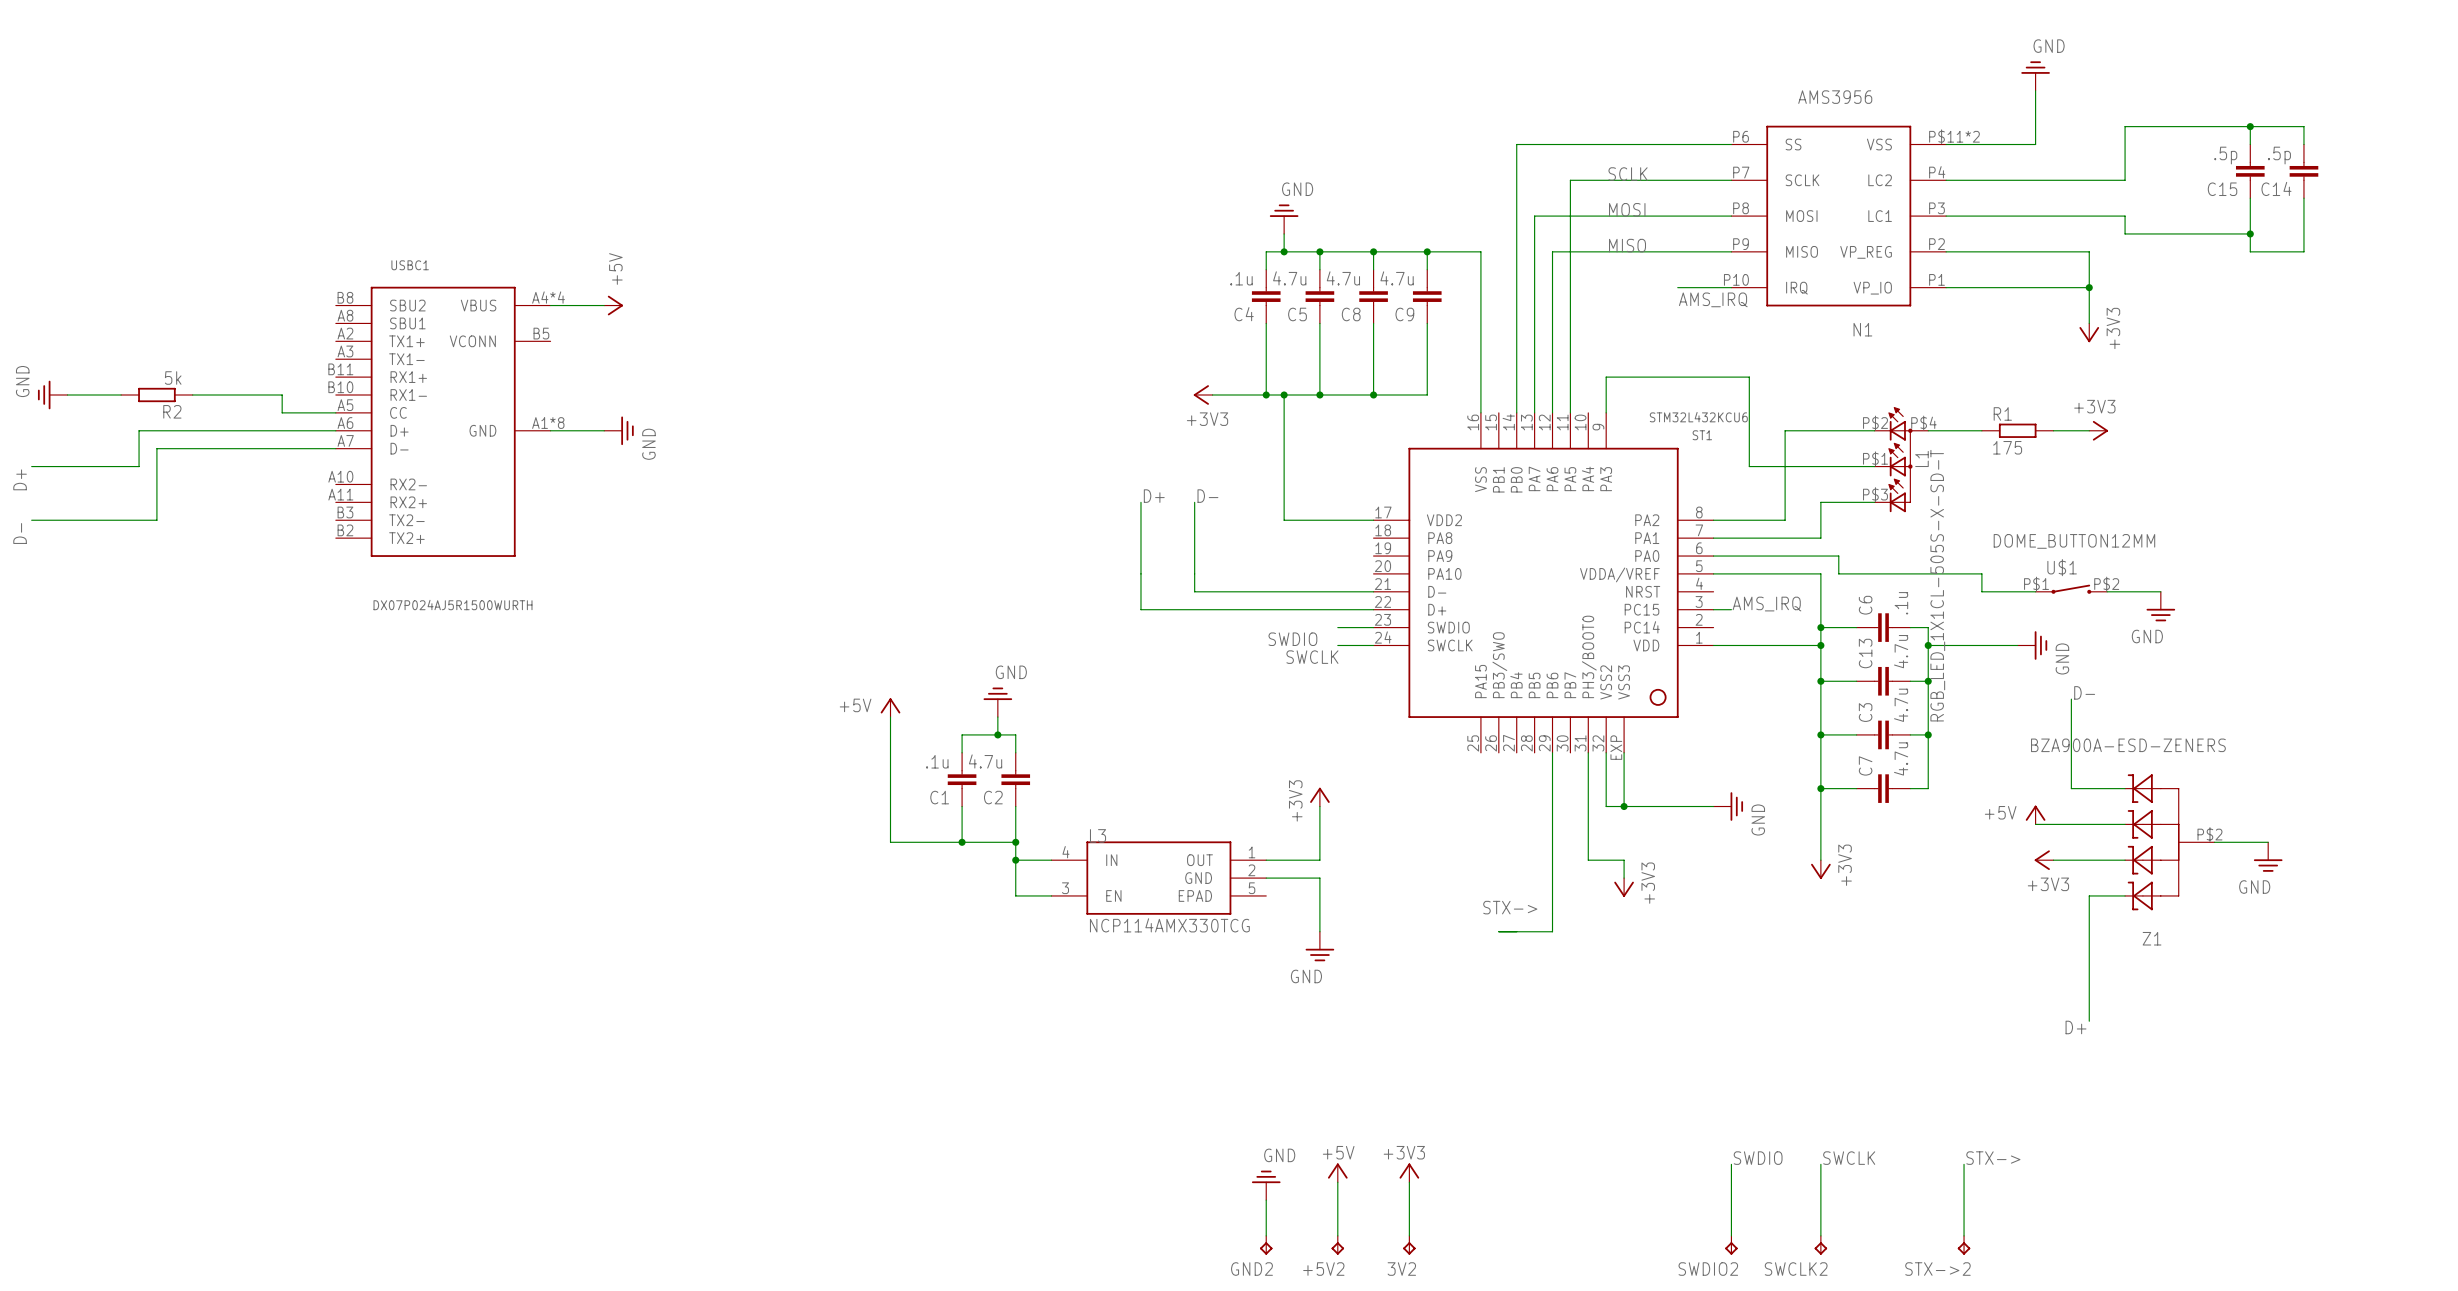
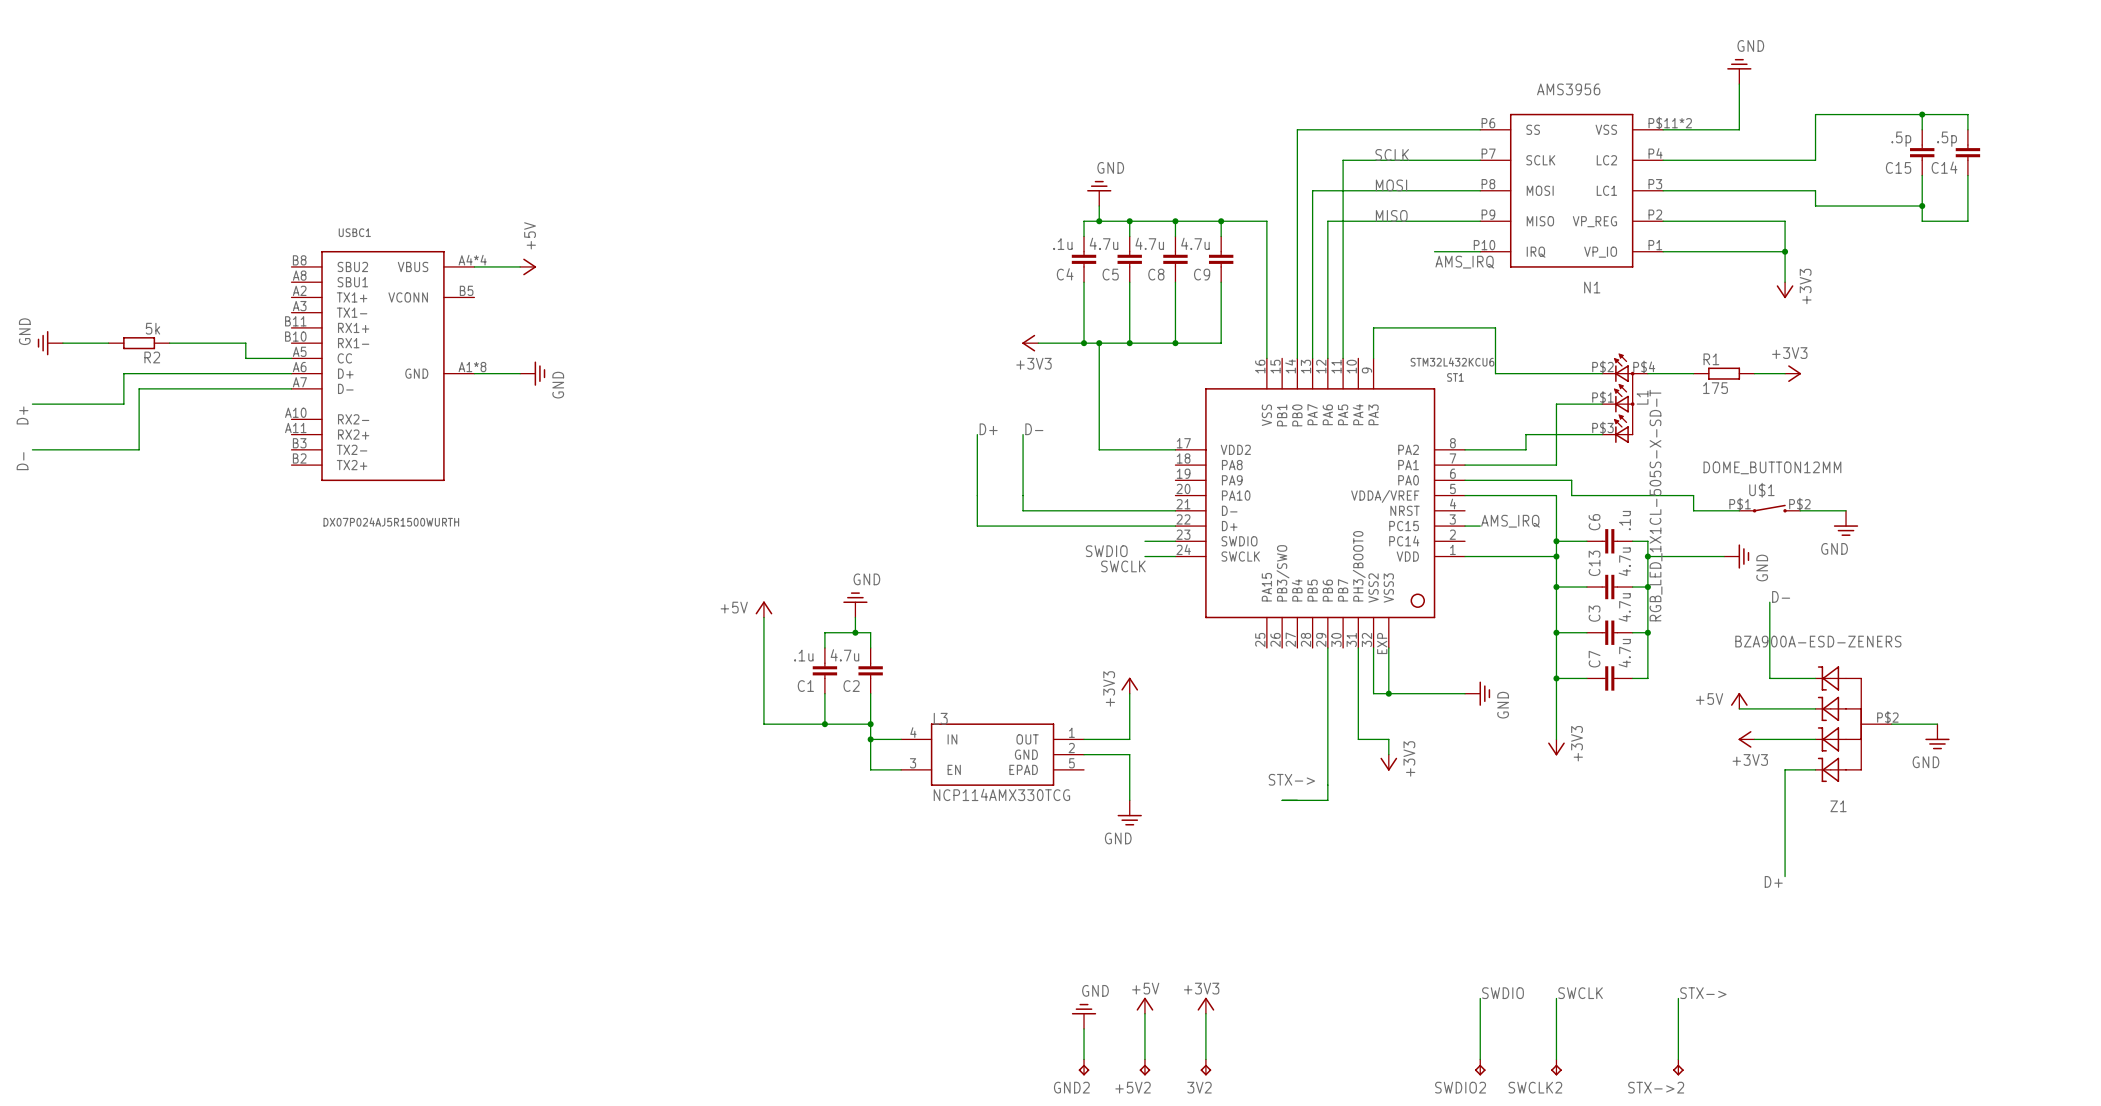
wire: (1749, 430) (1749, 466) (1820, 466) -> (1495, 373) (1525, 373)
wire: (1785, 430) (1785, 502) -> (1556, 404) (1556, 434) (1525, 434)

